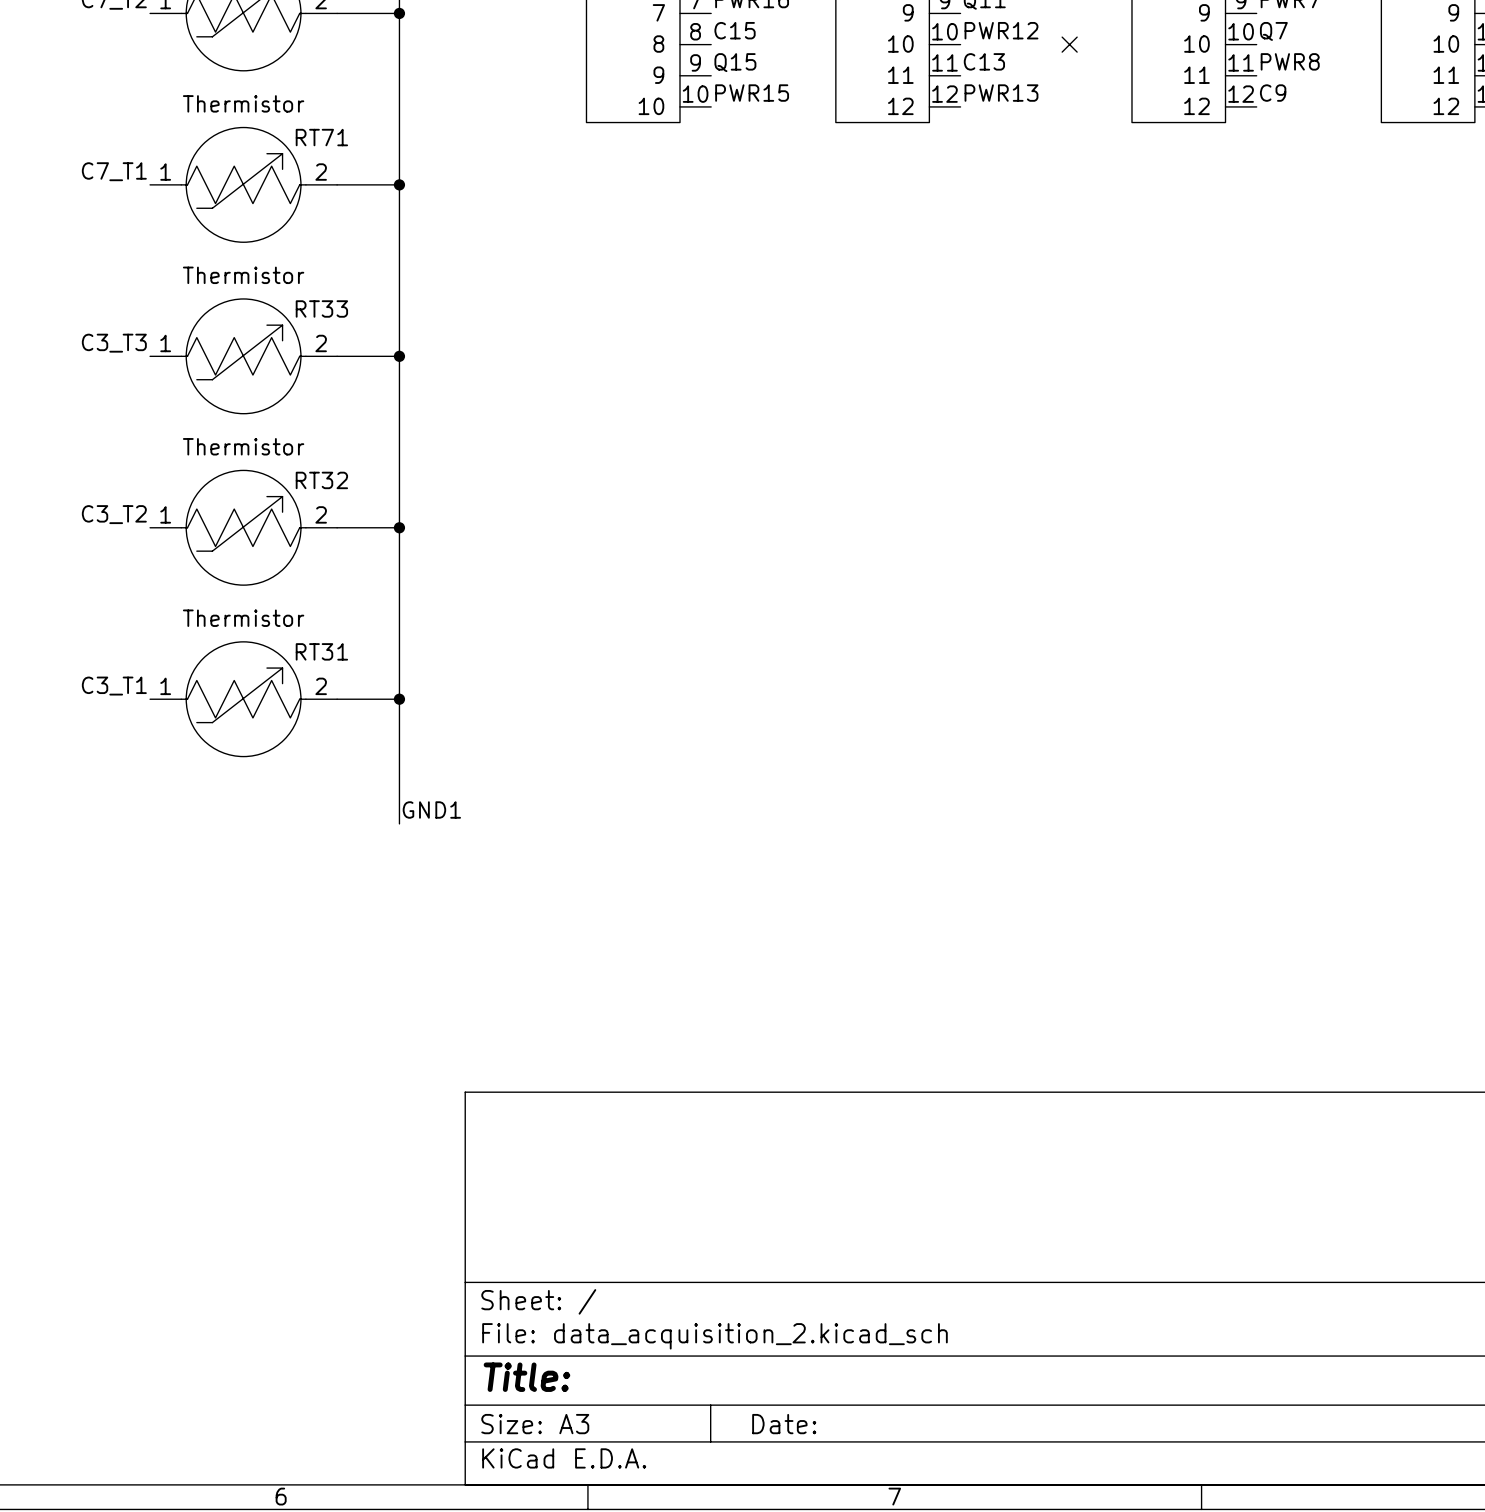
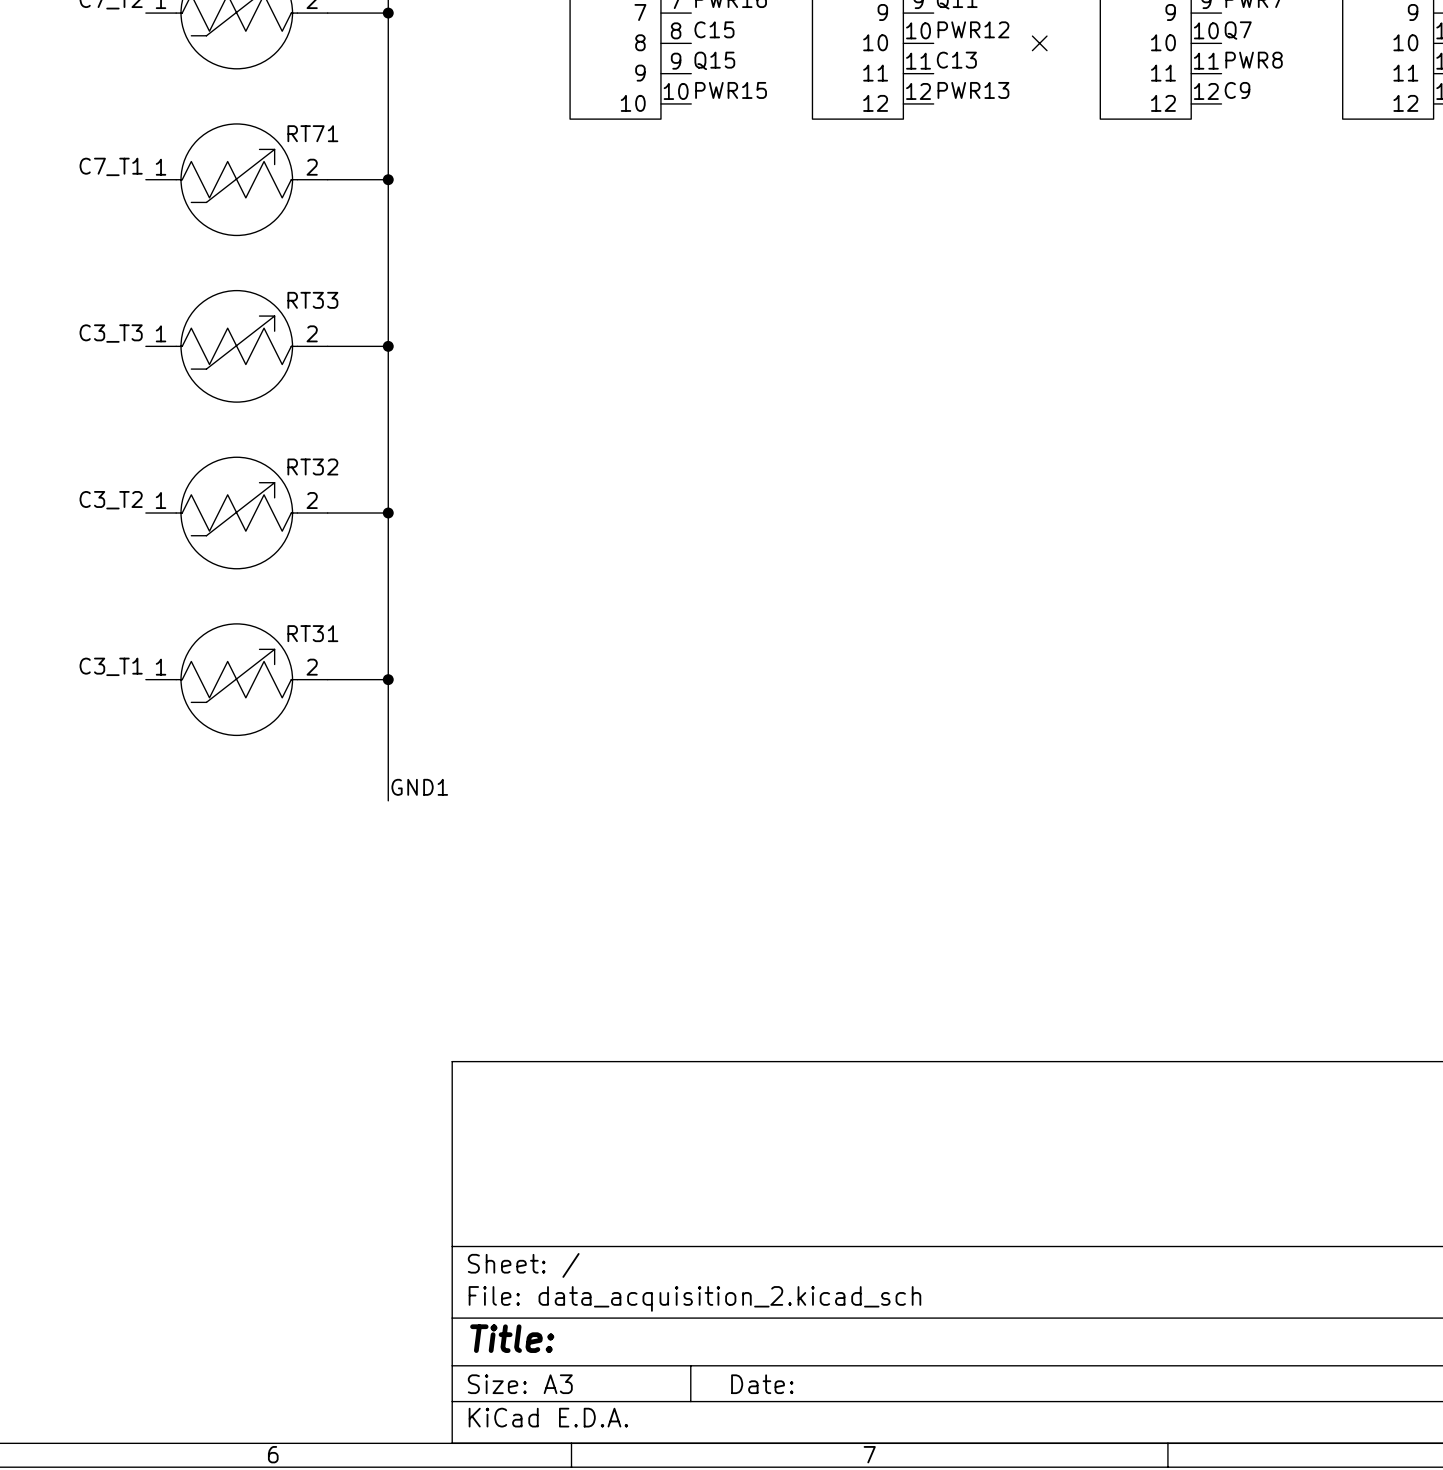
RT71 value: Thermistor (243, 103) -> none
RT33 value: Thermistor (243, 275) -> none
RT32 value: Thermistor (243, 446) -> none
RT31 value: Thermistor (243, 618) -> none

